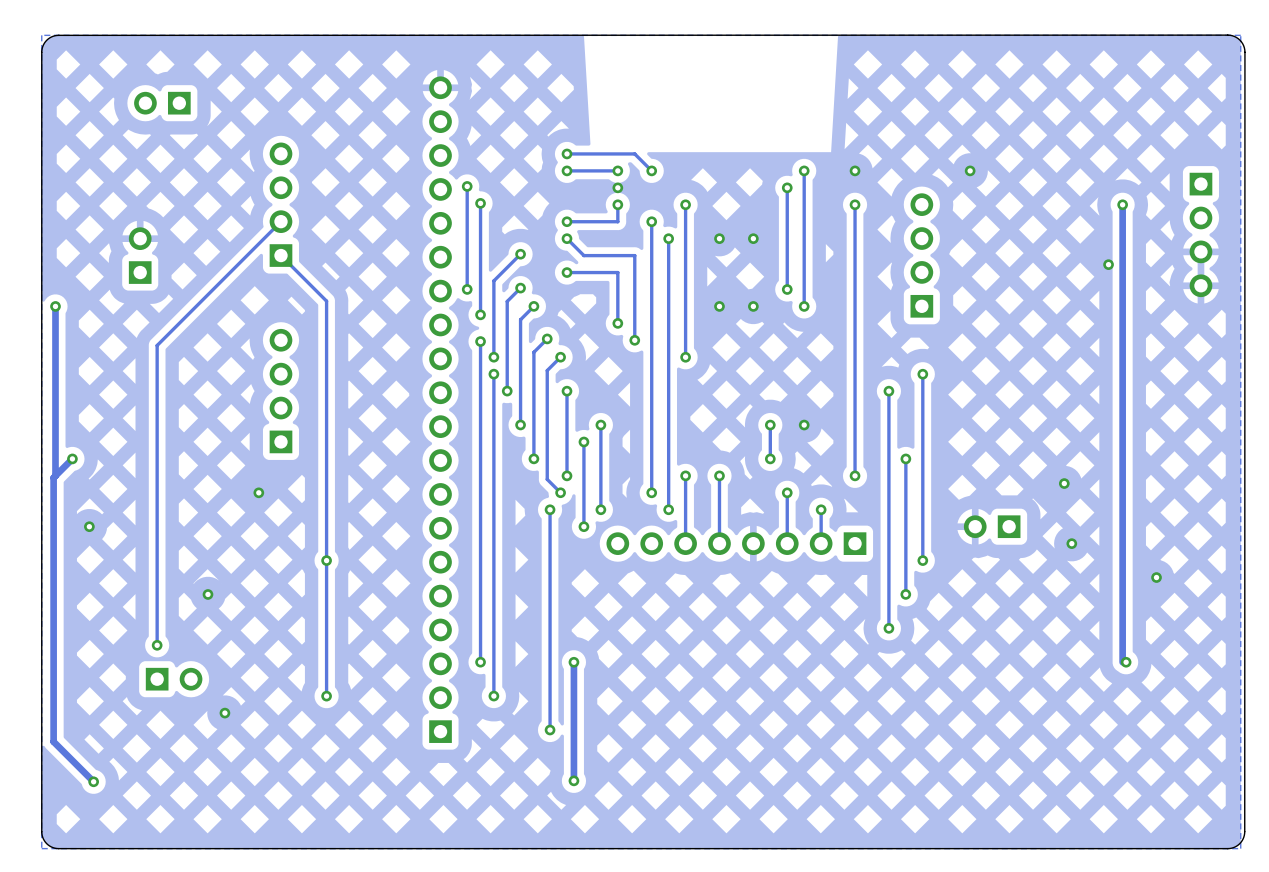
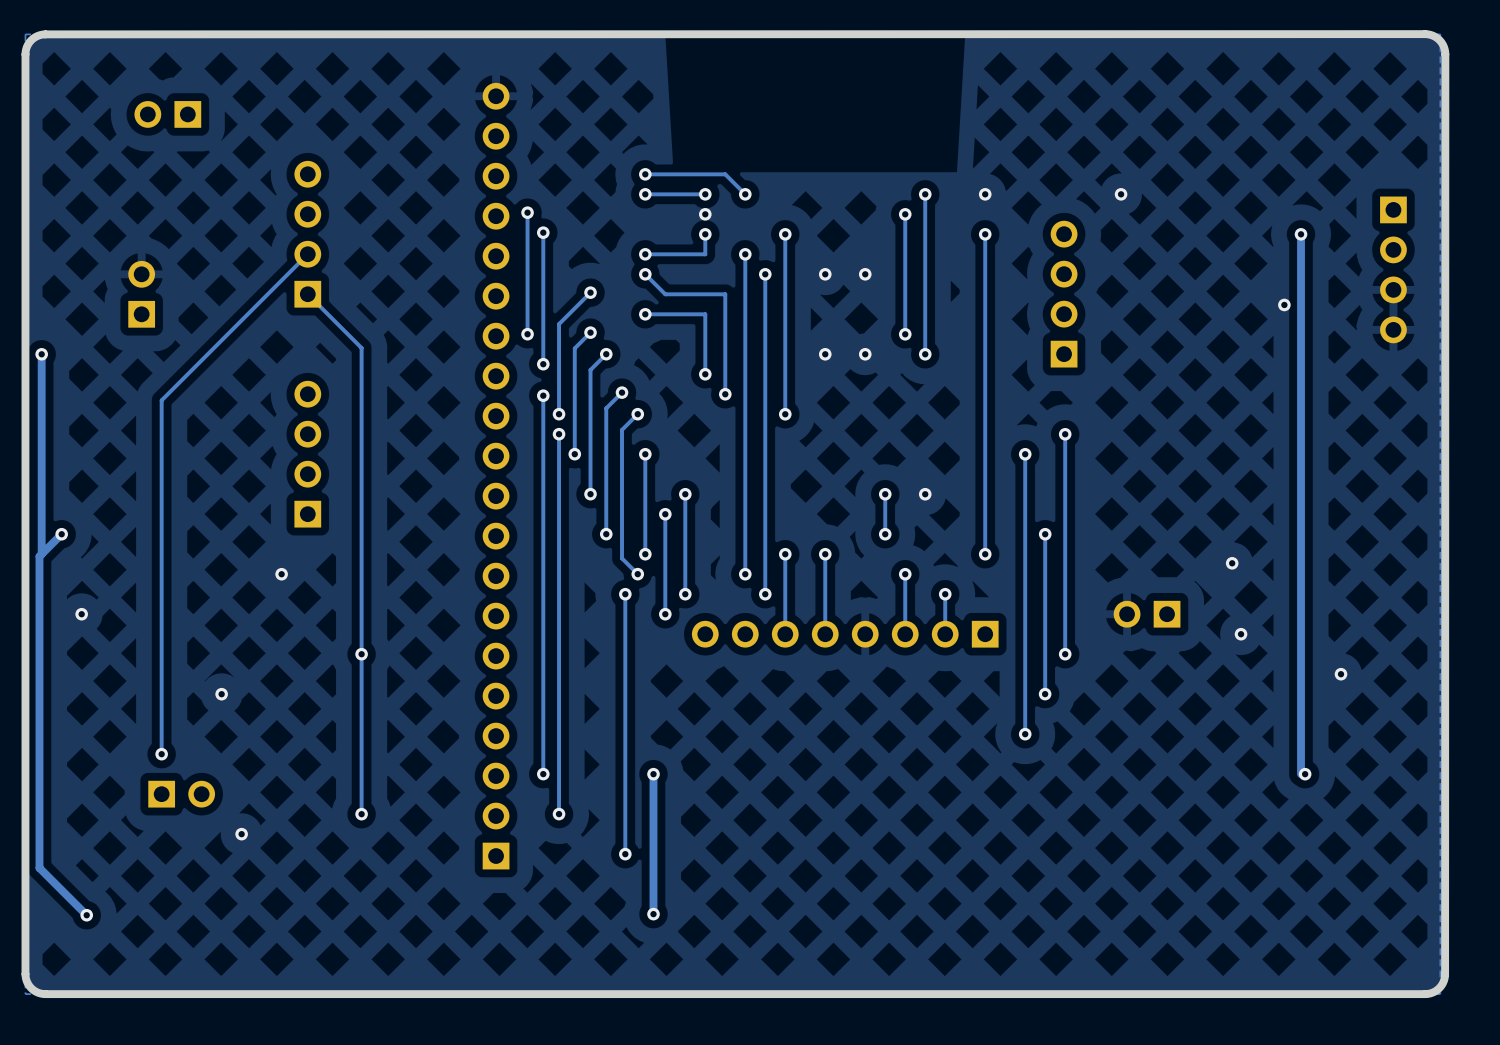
board edge width: thin (1227, 35) (58, 35) (49, 37) (43, 44) (41, 52) (41, 831) (44, 840) (49, 846) (58, 848) (1227, 848) (1236, 846) (1242, 840) (1244, 831) (1244, 52) (1239, 40) (1227, 35) -> thick (1425, 34) (45, 34) (34, 37) (27, 45) (25, 54) (25, 974) (28, 984) (34, 991) (45, 994) (1425, 994) (1435, 991) (1442, 984) (1445, 974) (1445, 54) (1443, 46) (1439, 40) (1432, 35) (1425, 34)

